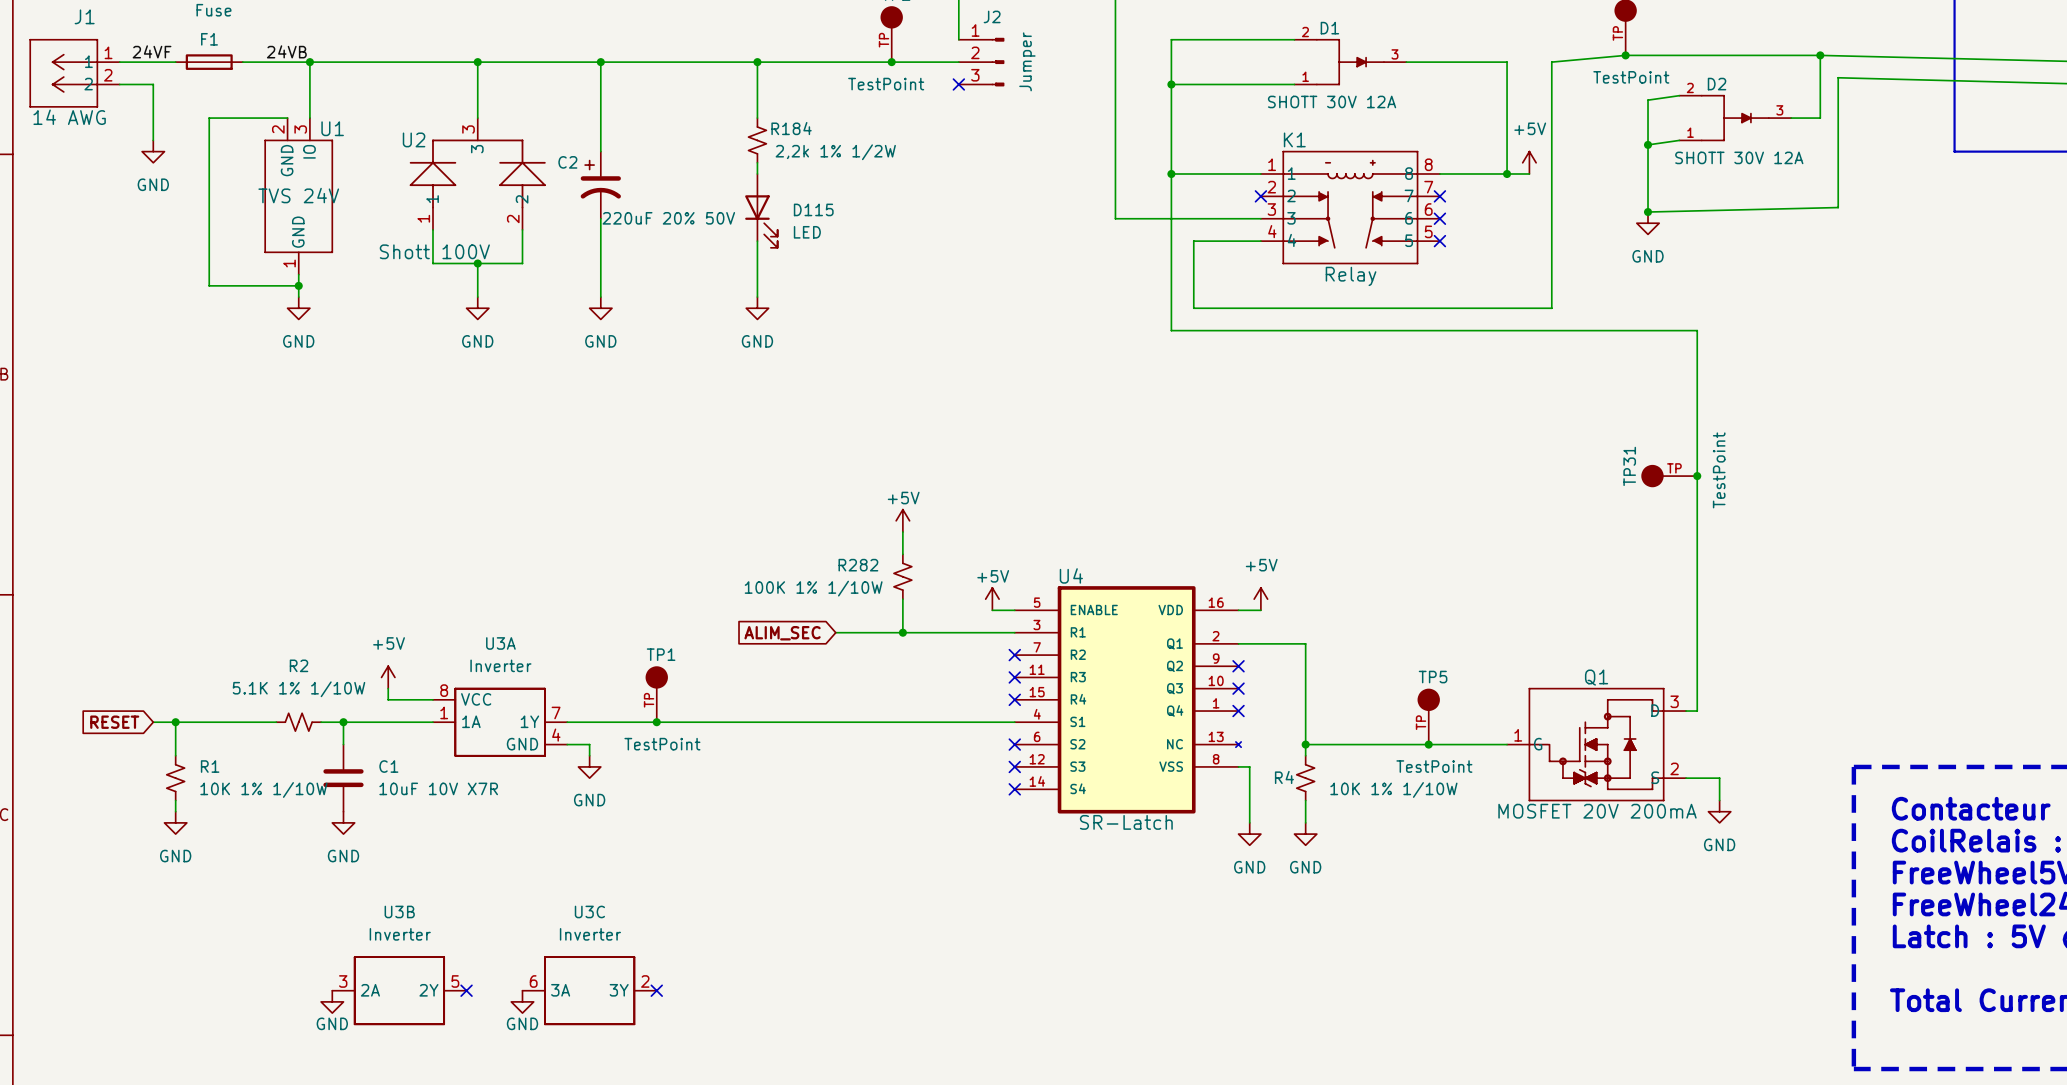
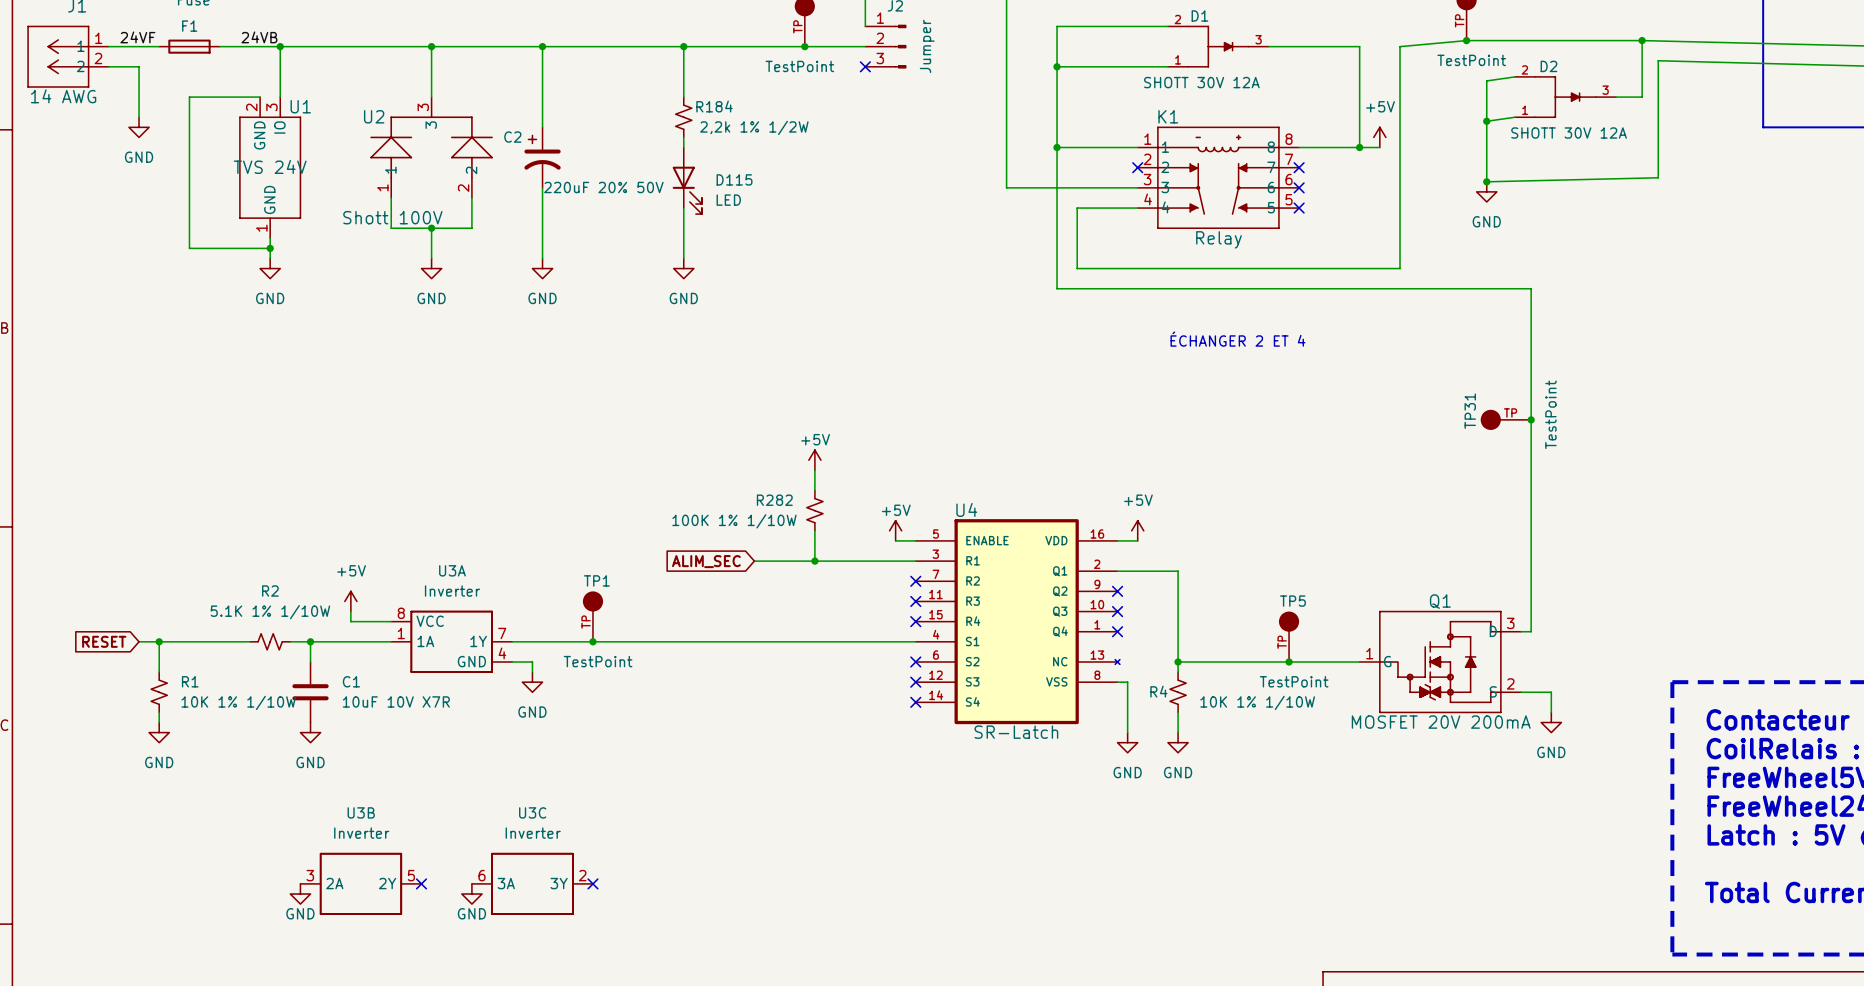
text: none -> ÉCHANGER 2 ET 4 (1237, 339)

